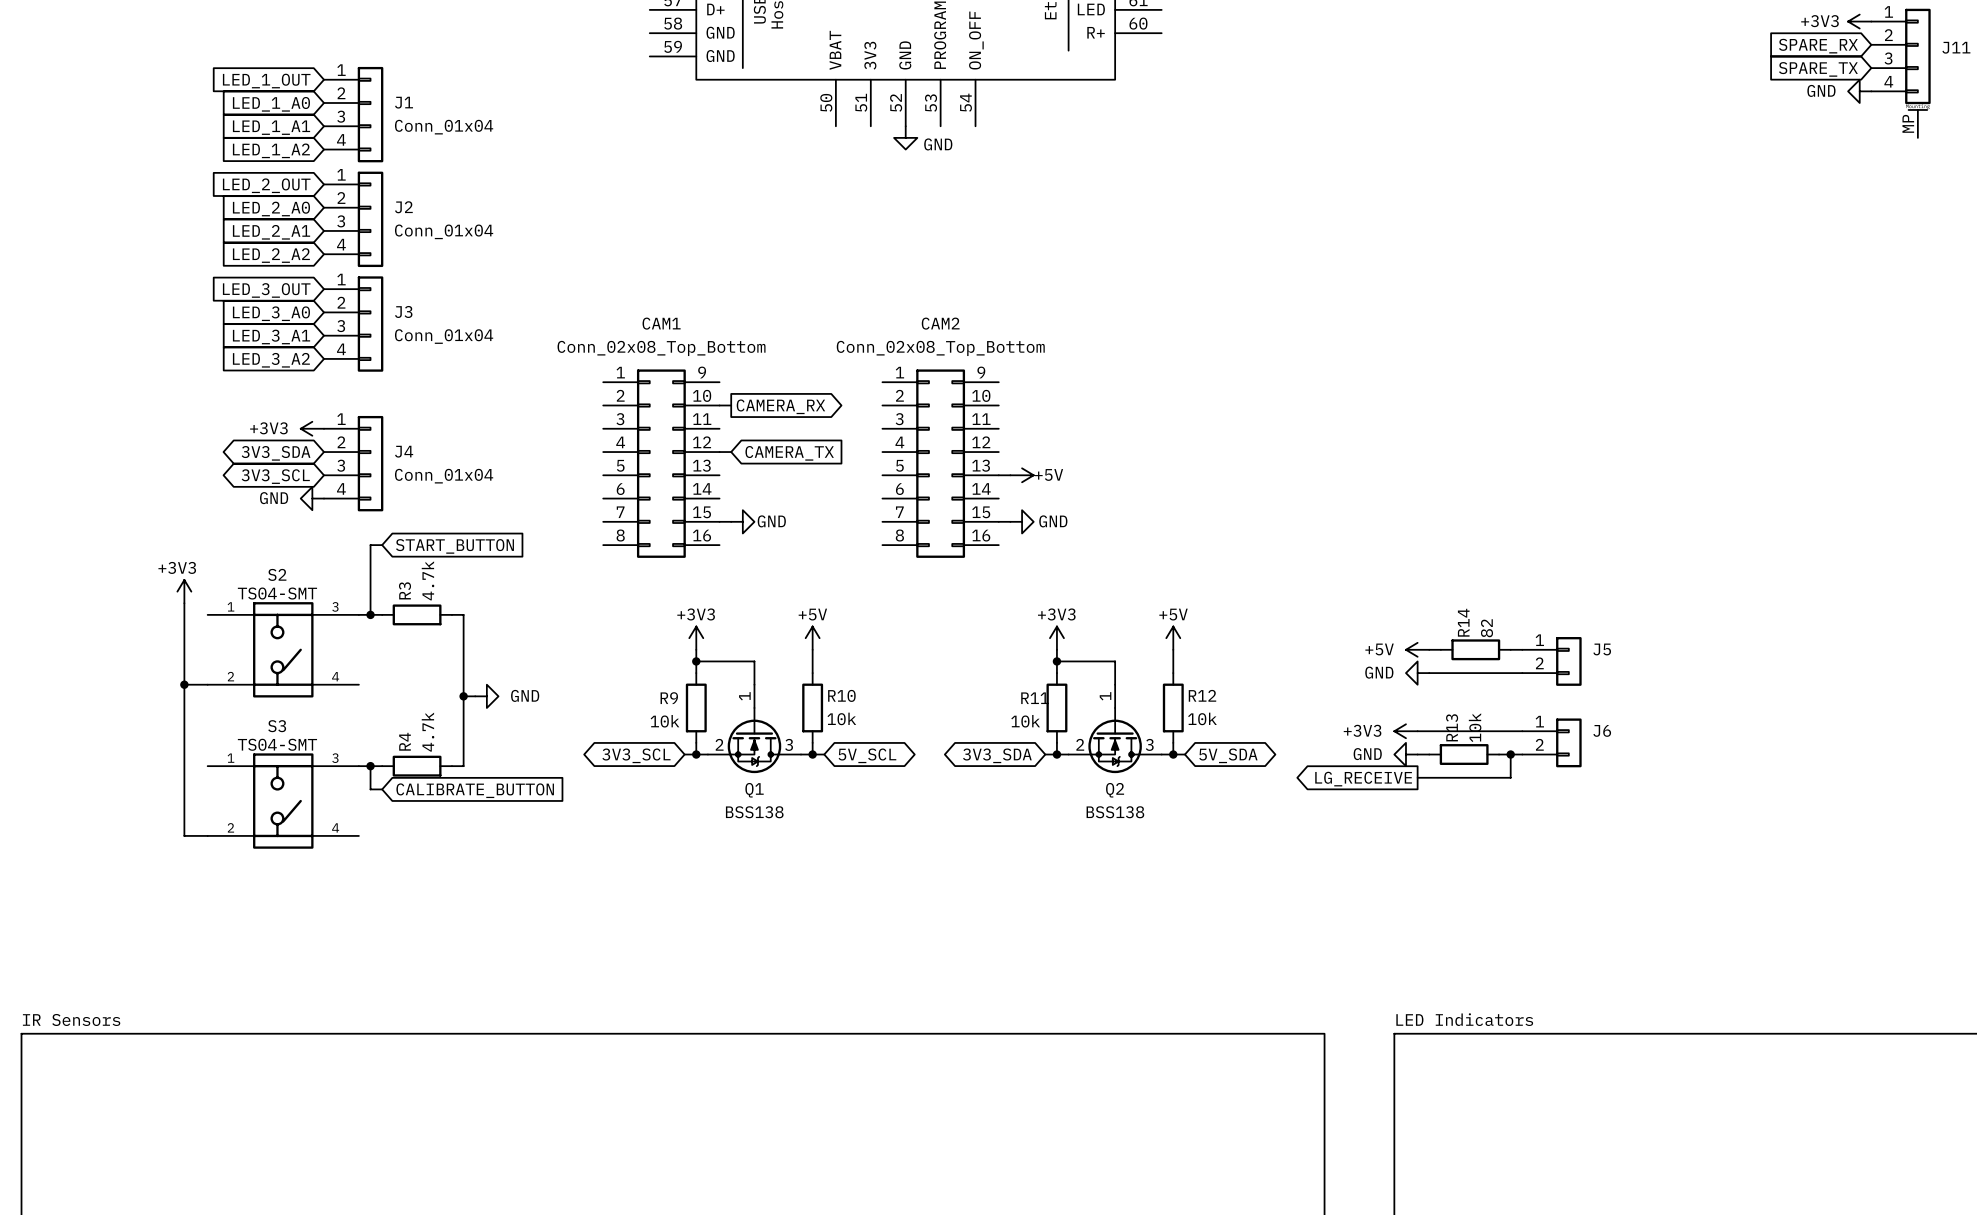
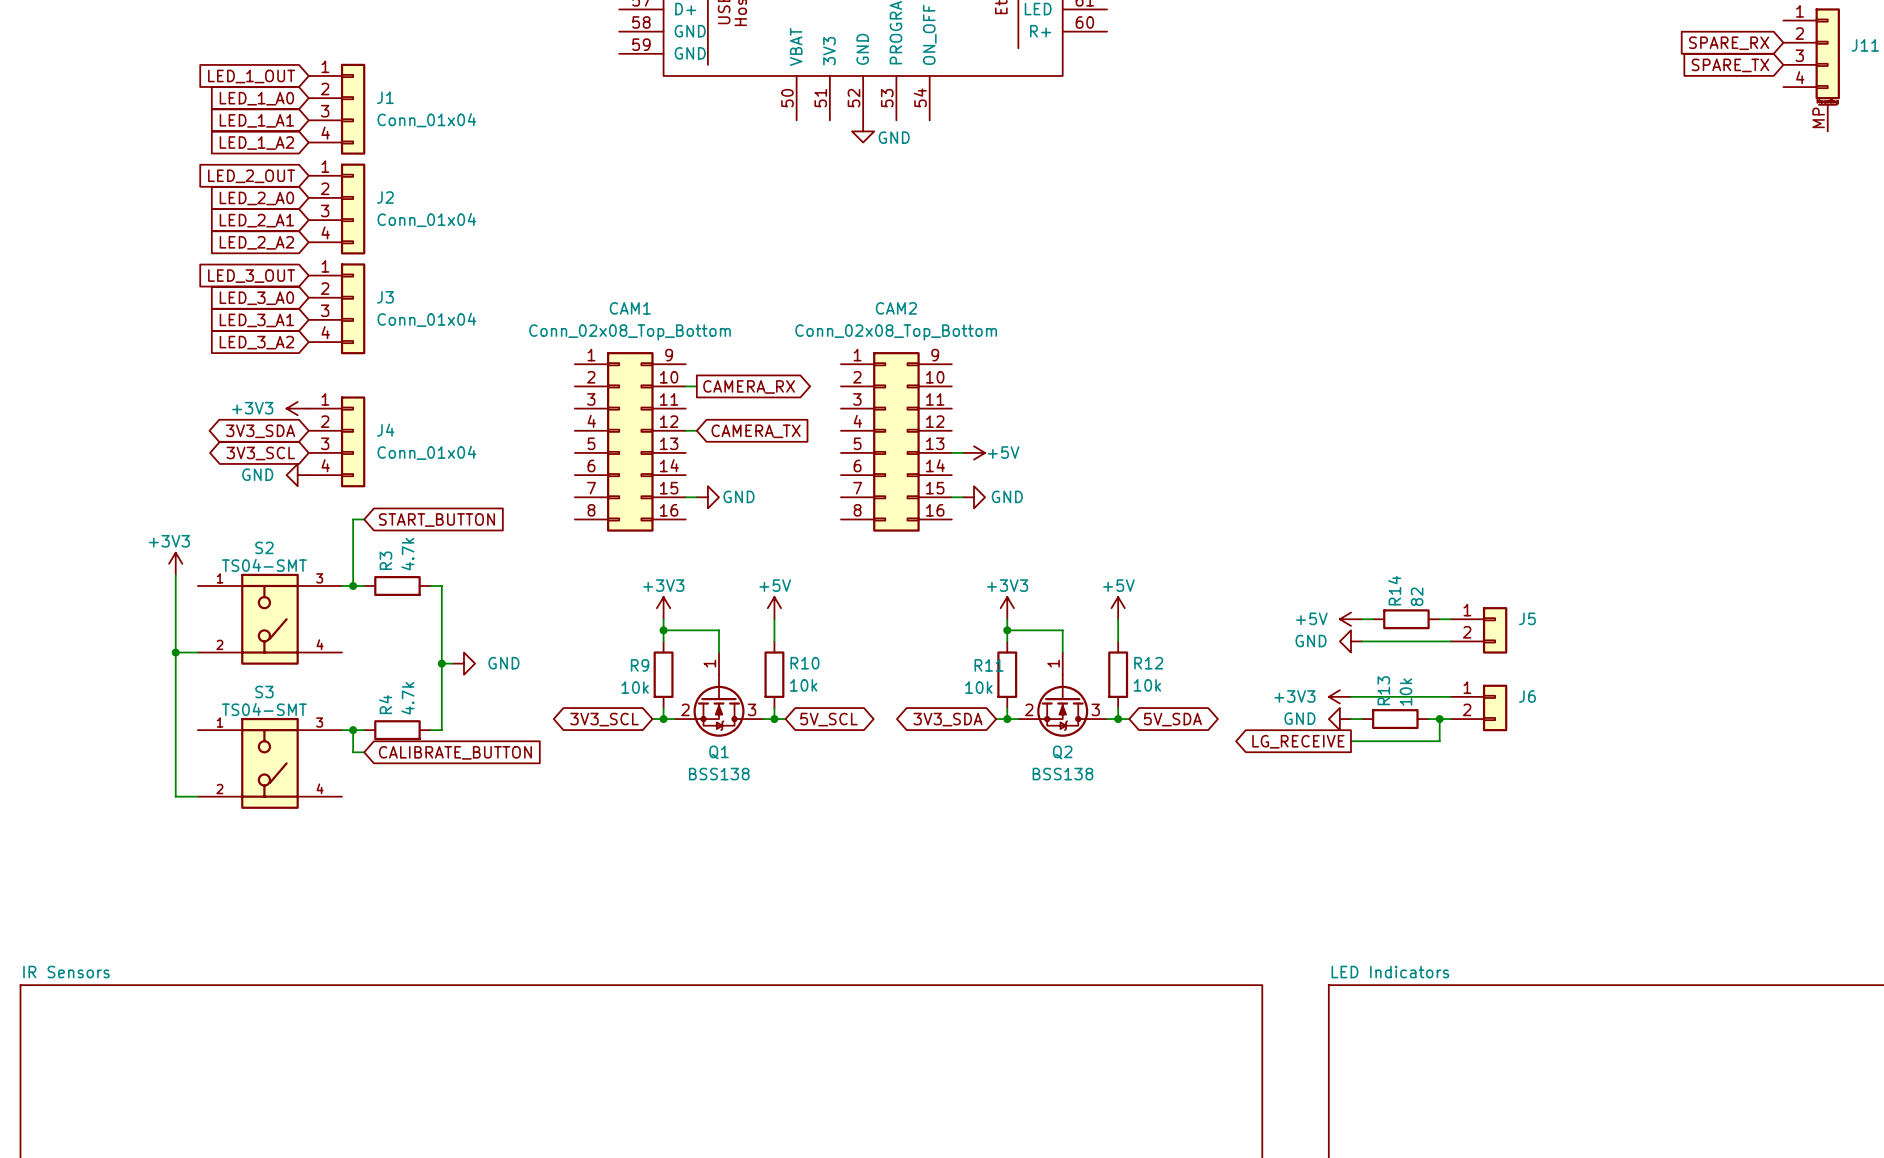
power symbol: +3V3 (1859, 21) -> none
power symbol: GND (1859, 91) -> none

